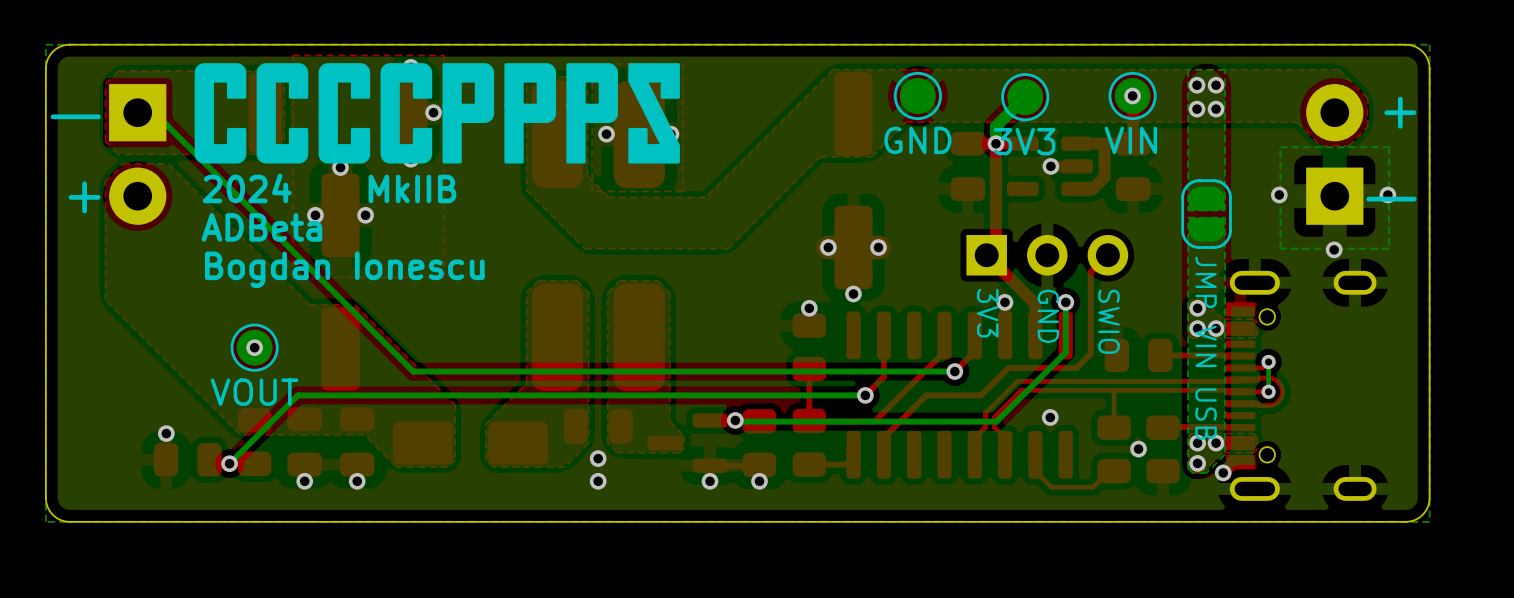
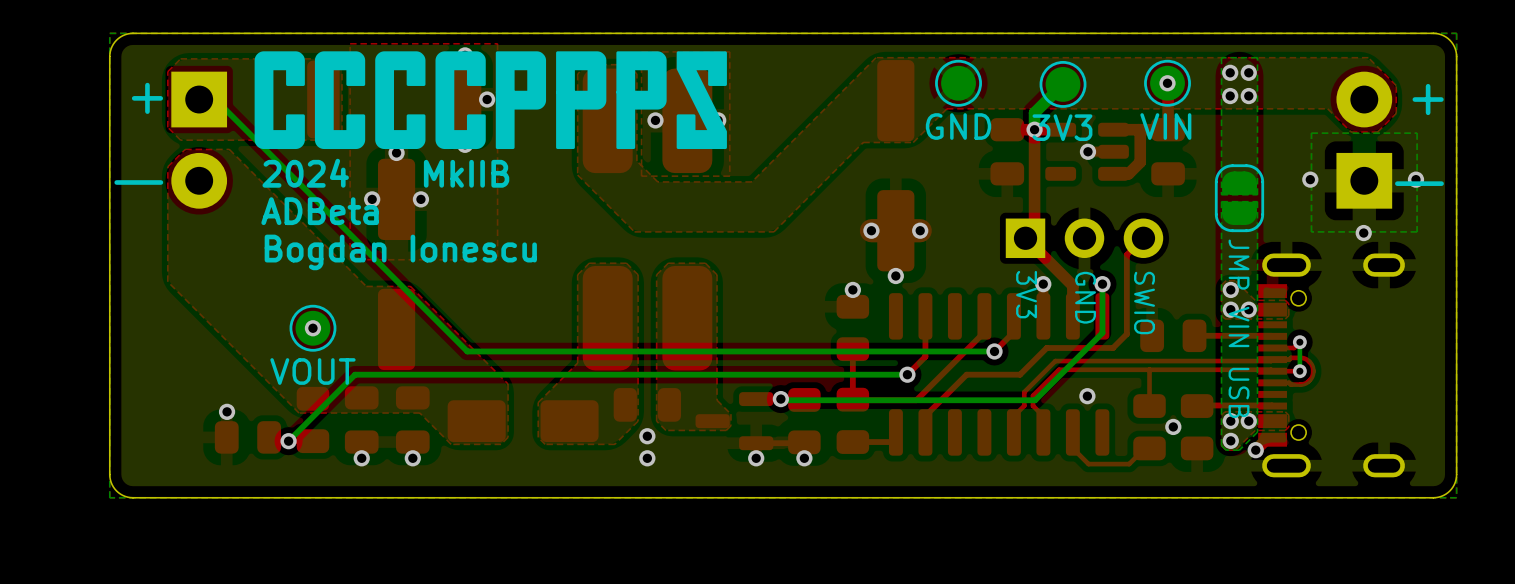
text position: - (75, 116) -> - (138, 182)
text position: + (84, 197) -> + (147, 98)

